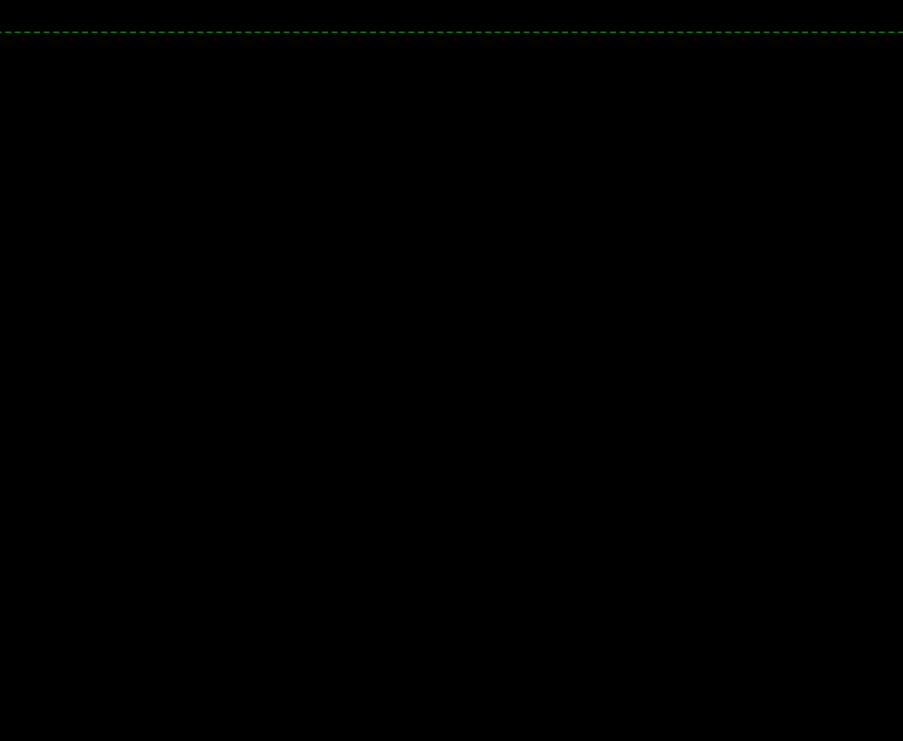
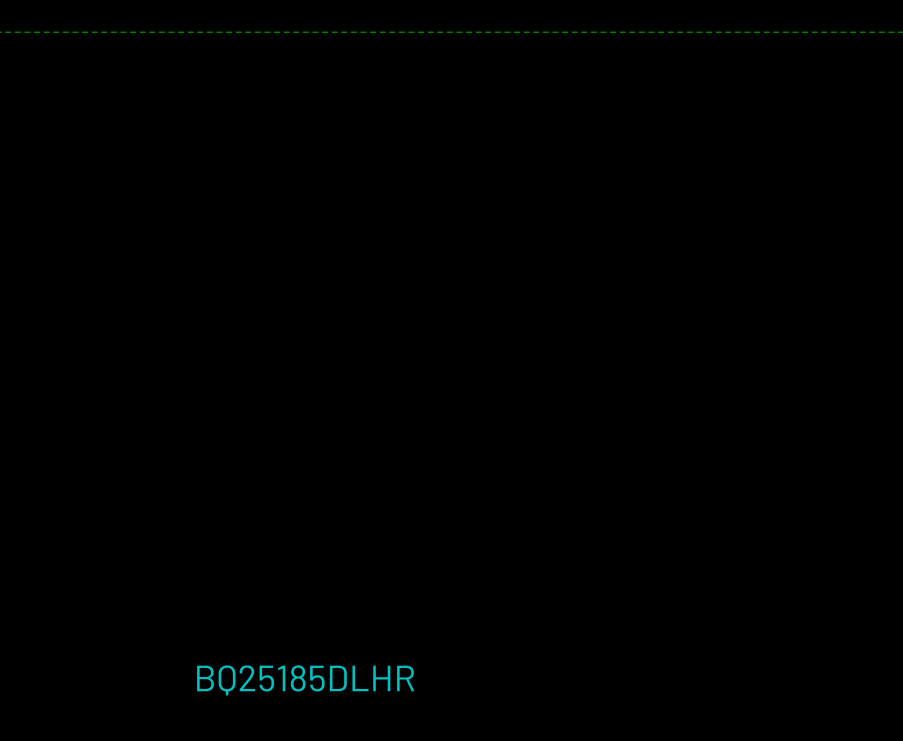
text: none -> BQ25185DLHR (305, 680)

